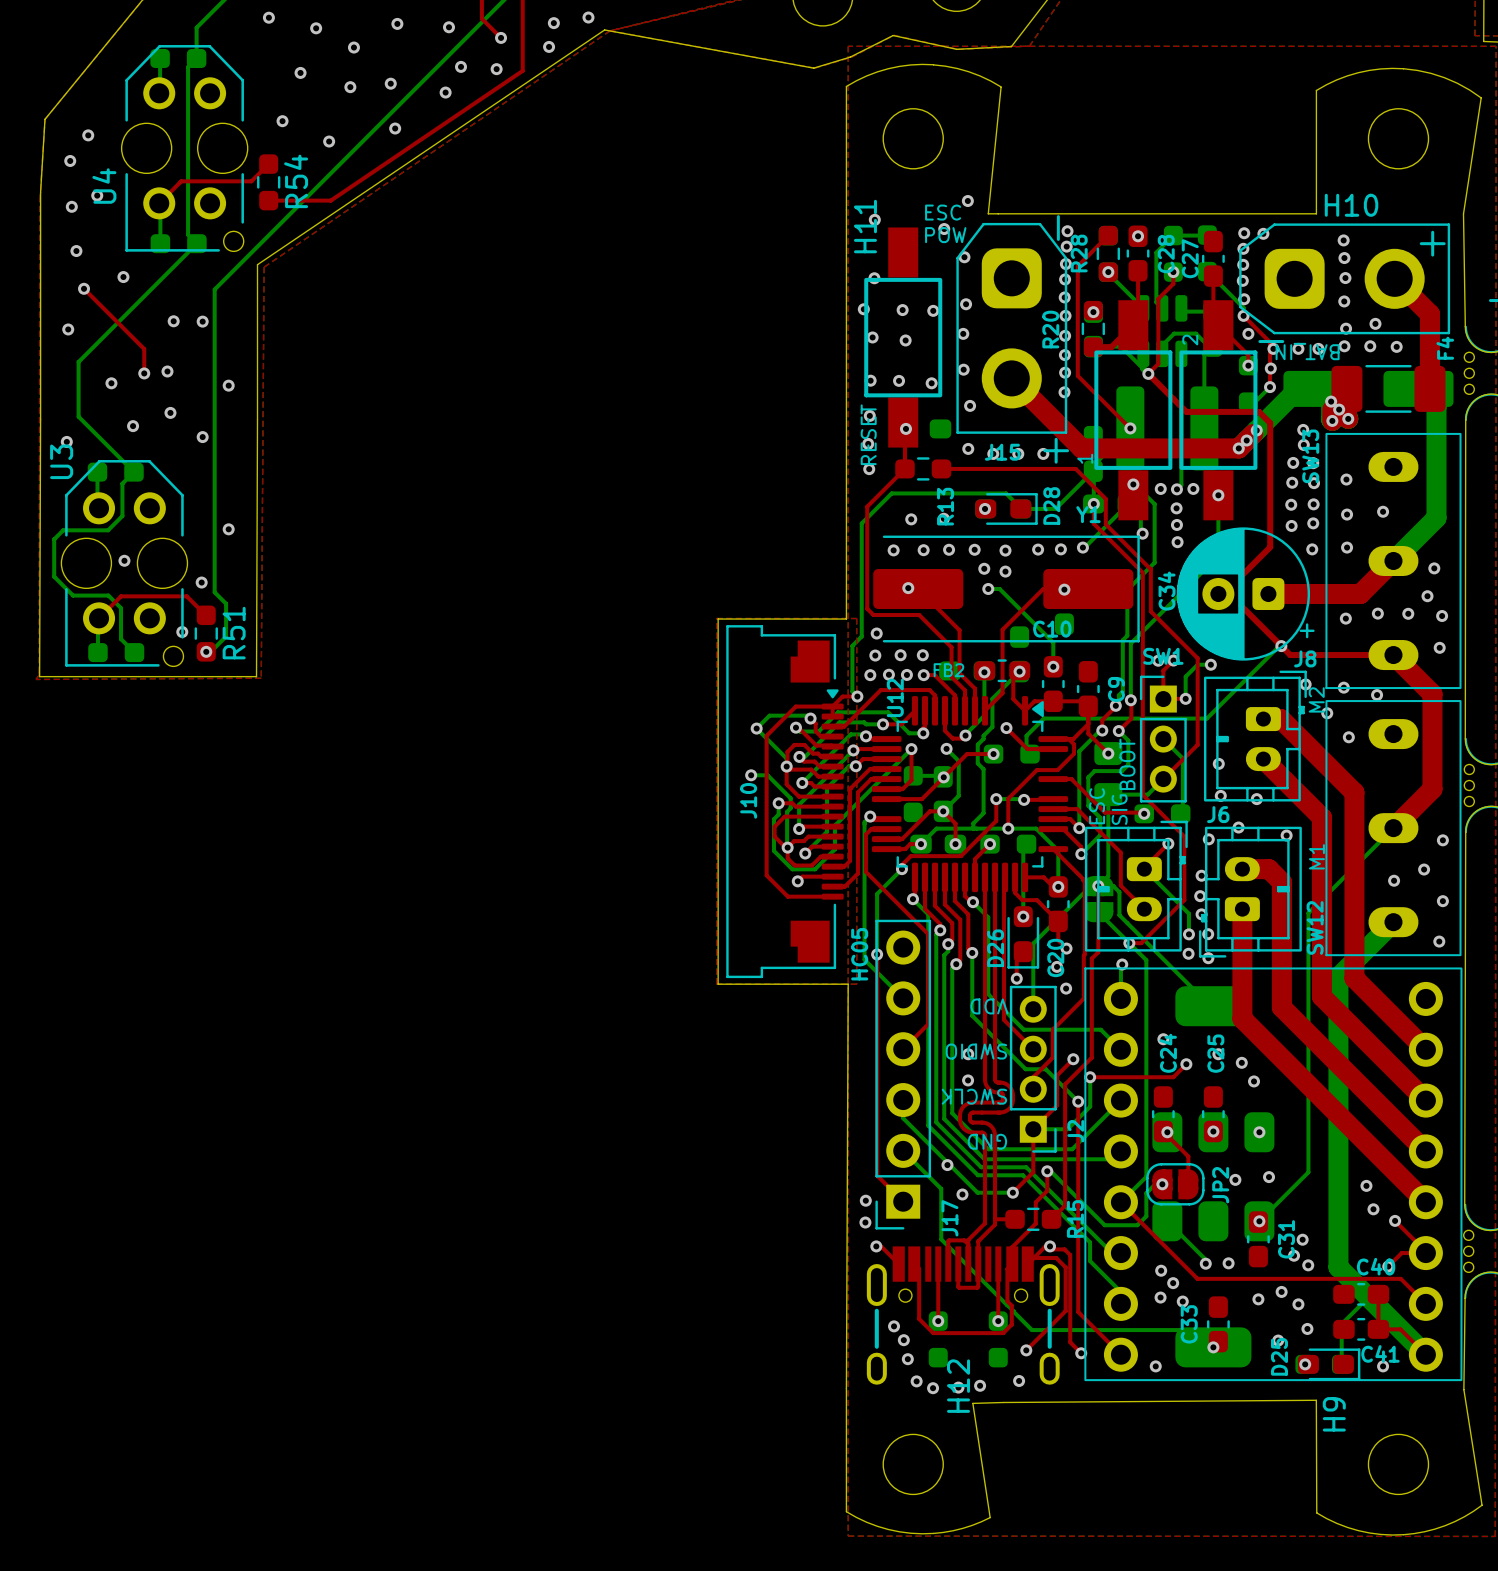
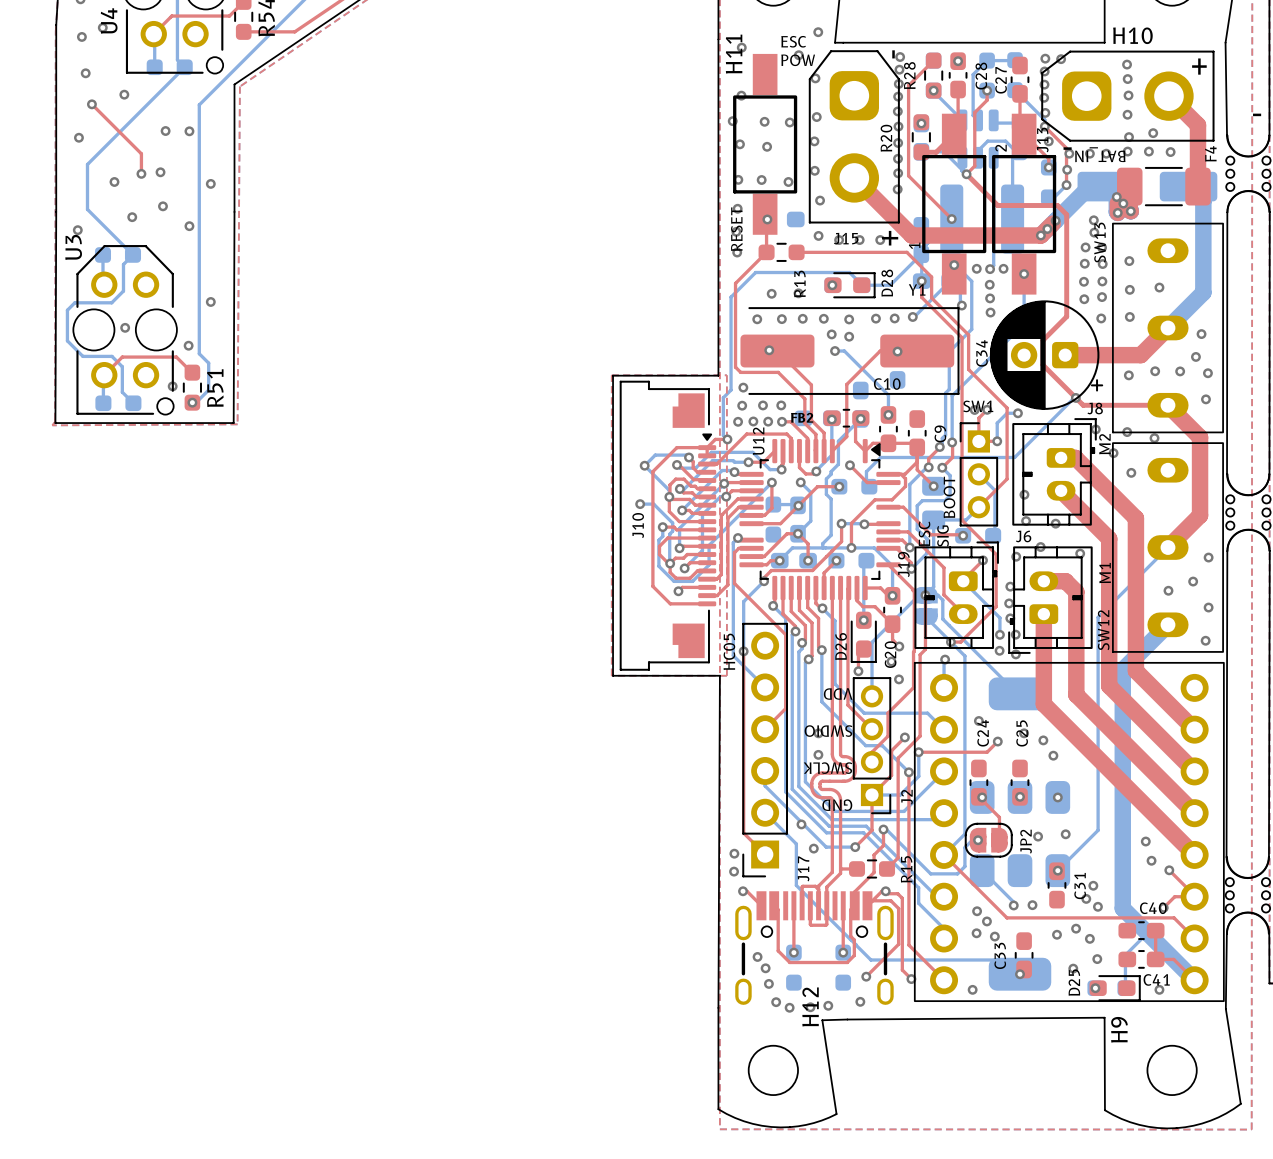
J13 name: none -> J13 (1042, 139)
J19 name: none -> J19 (903, 564)

